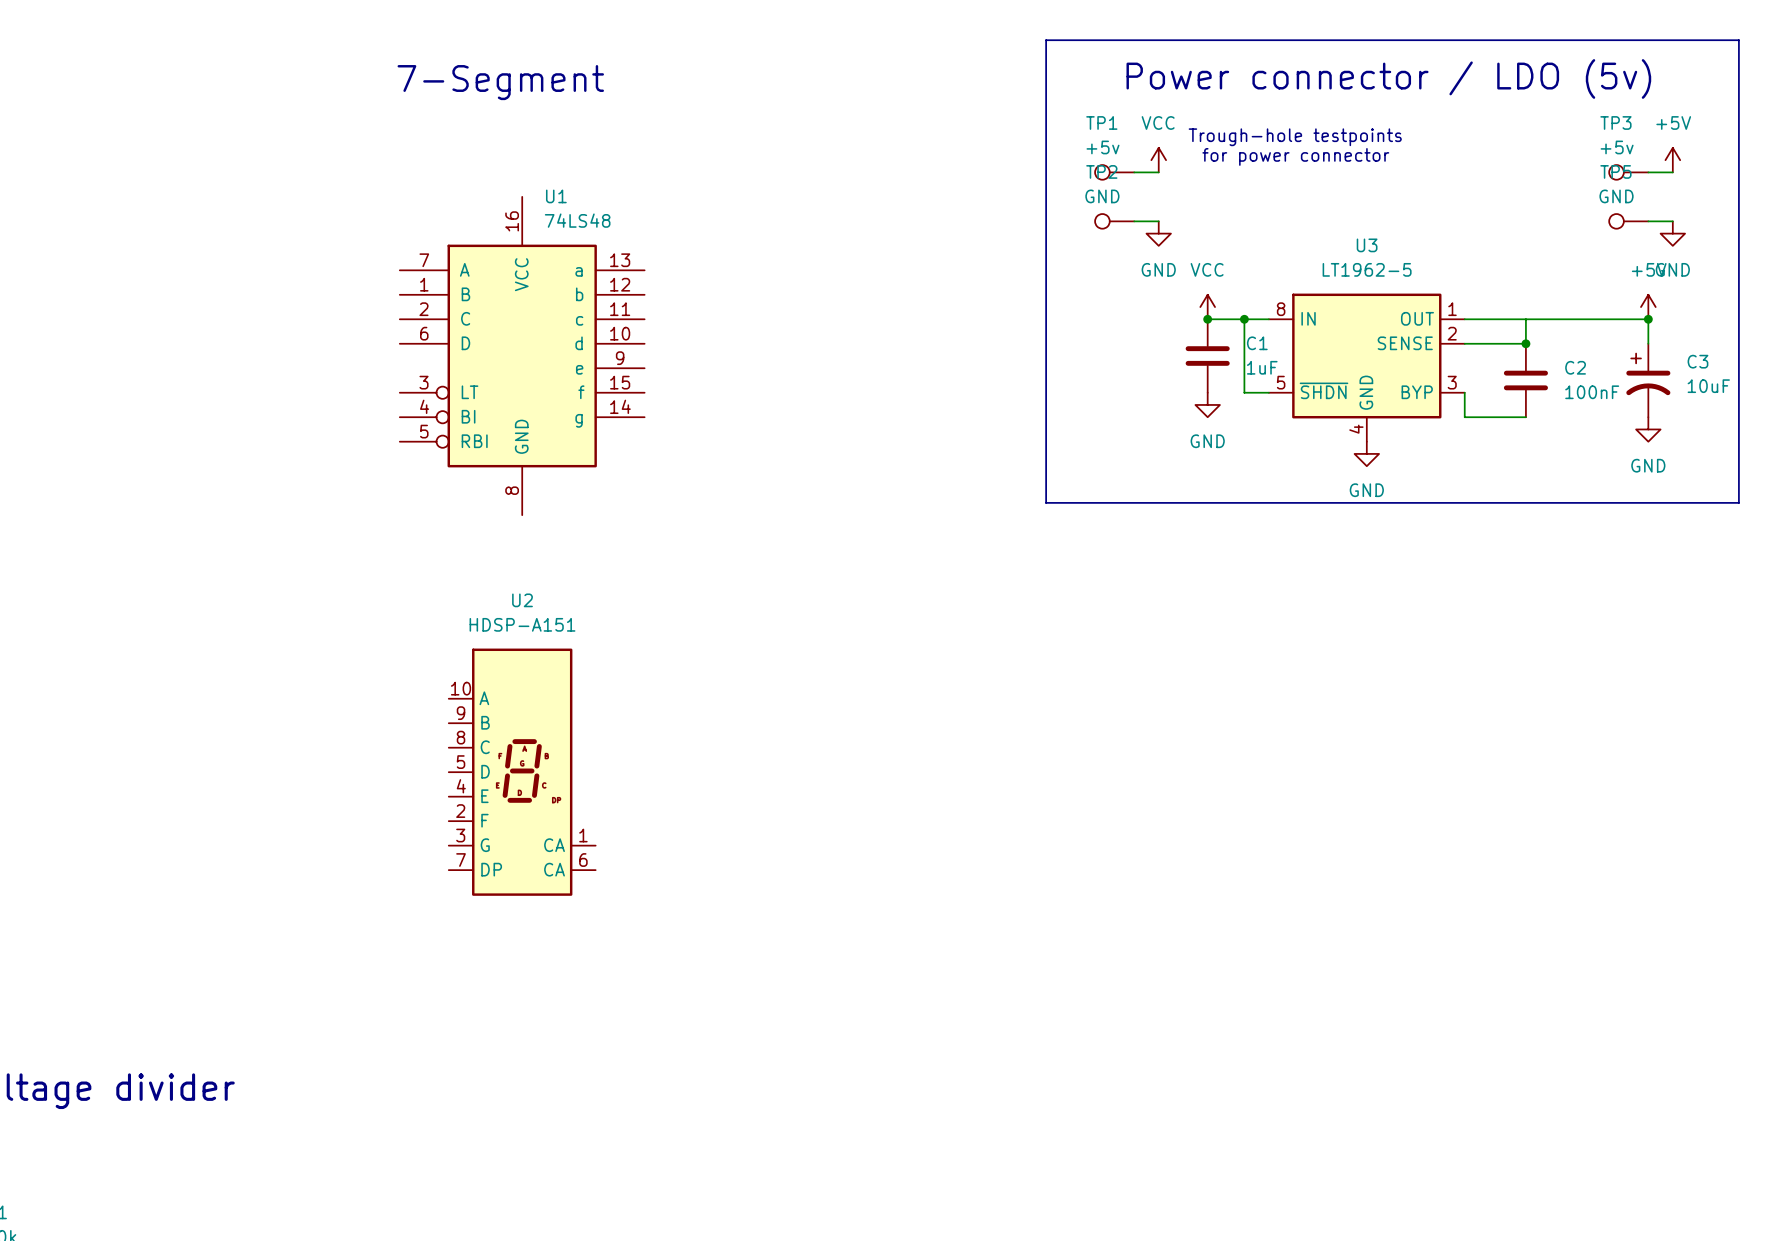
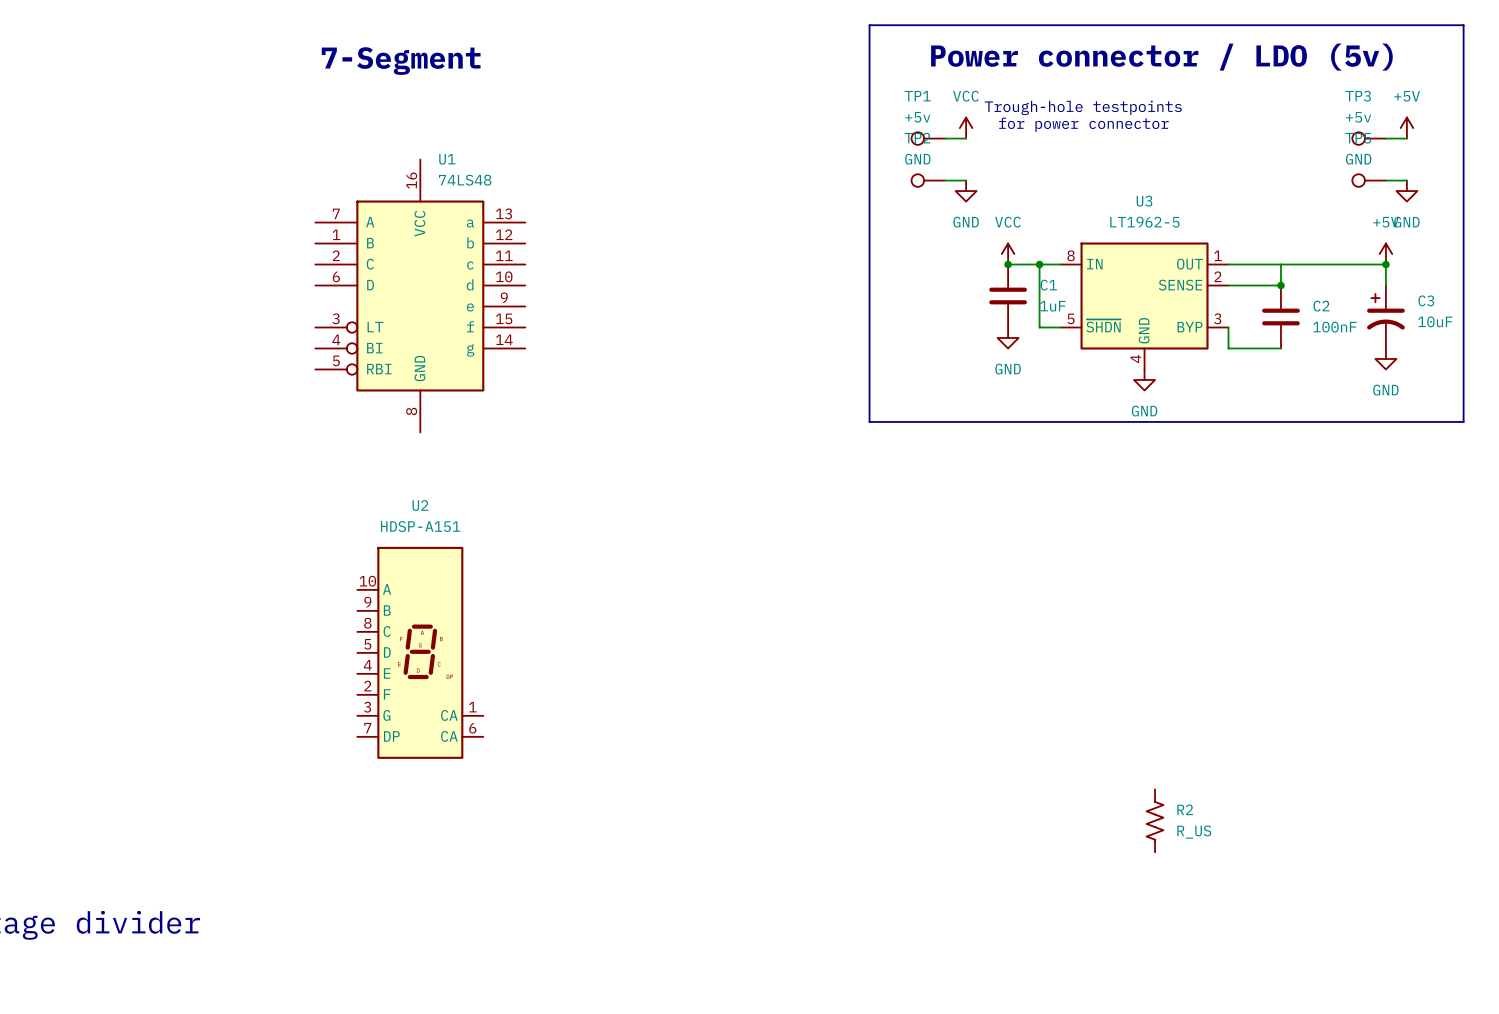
R2: none -> R_US (1155, 820)

